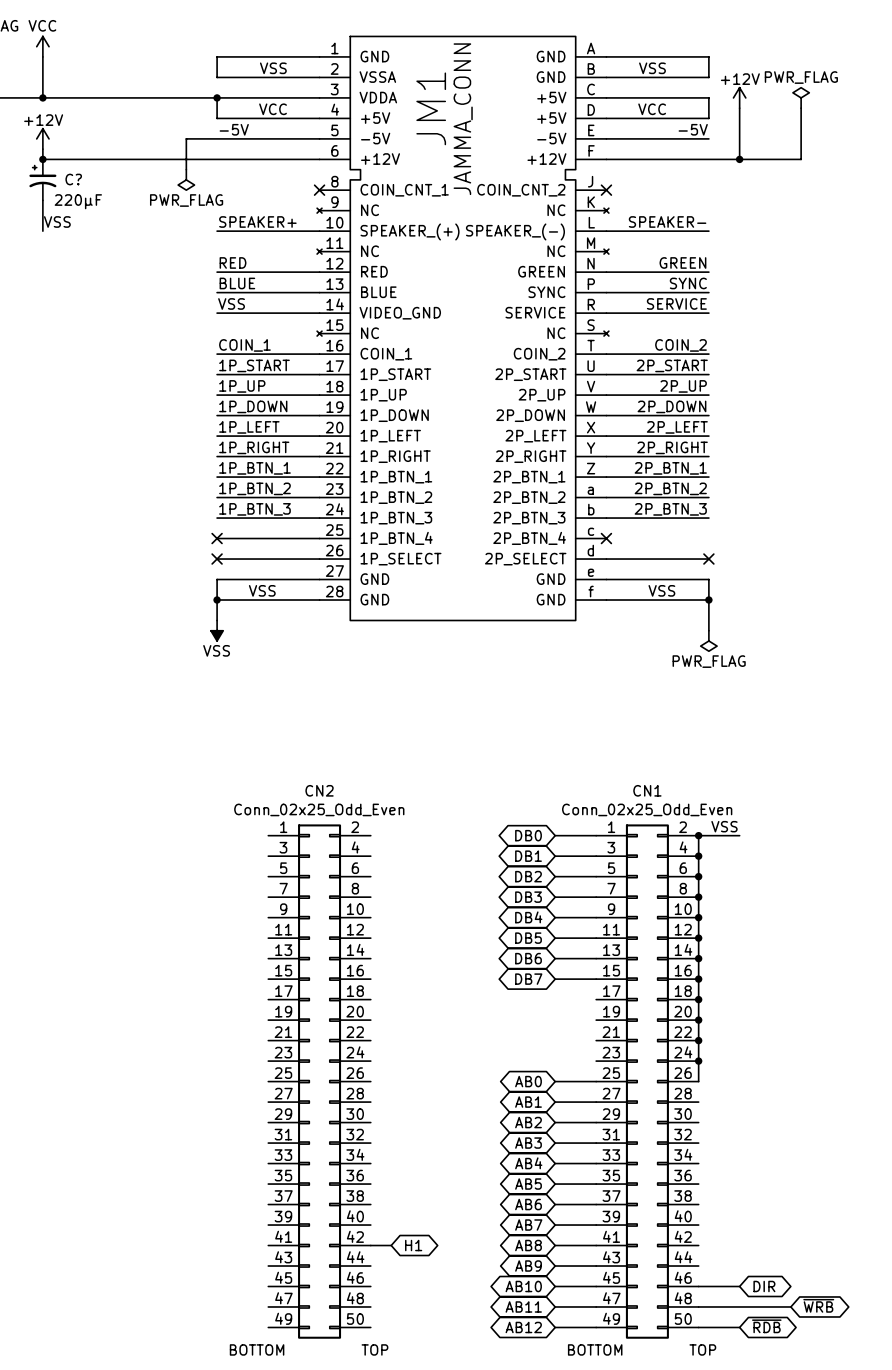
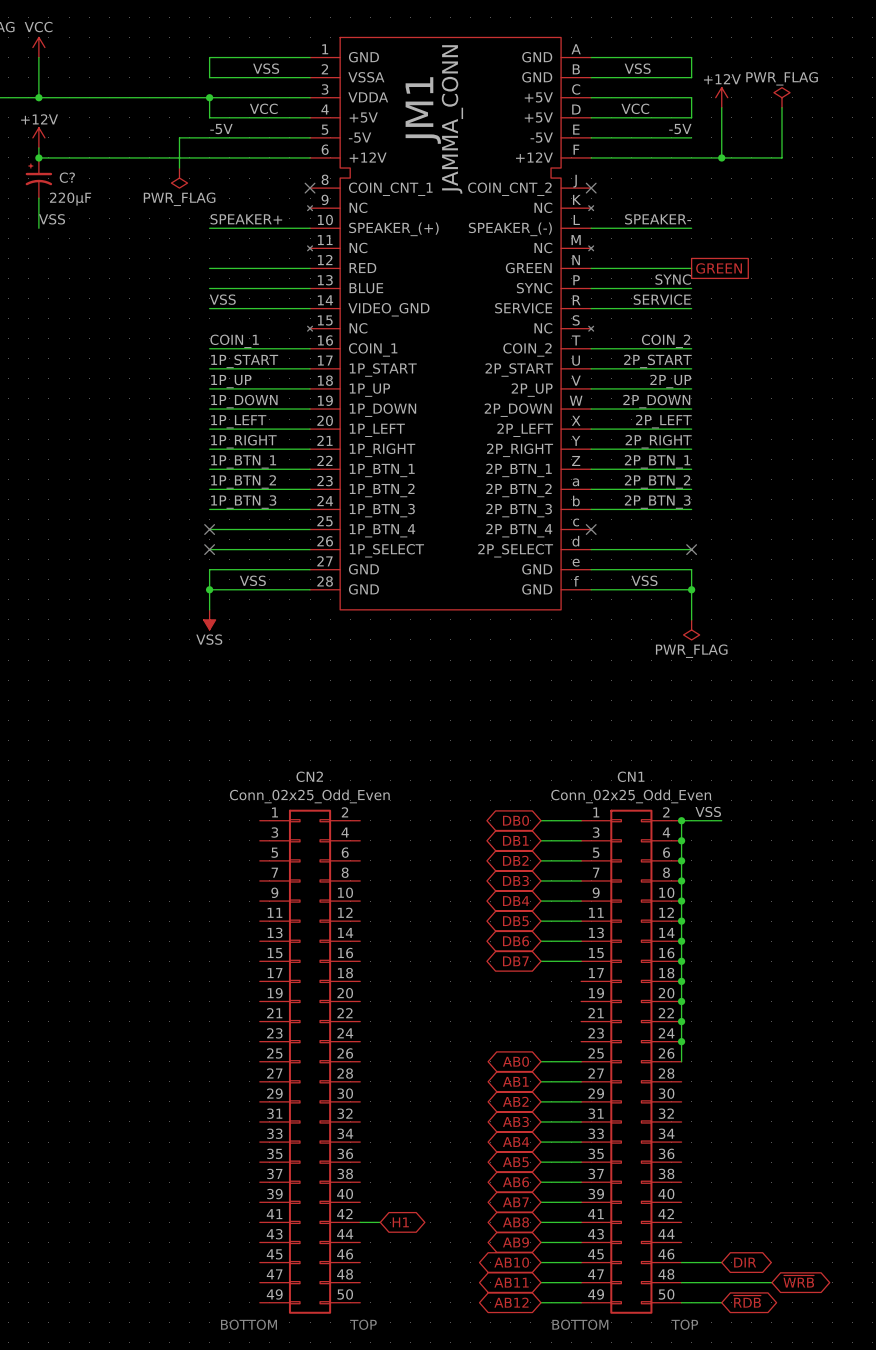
label: RED (233, 262) -> none
label: GREEN (682, 262) -> none
global label: none -> GREEN (719, 268)
label: BLUE (237, 283) -> none

